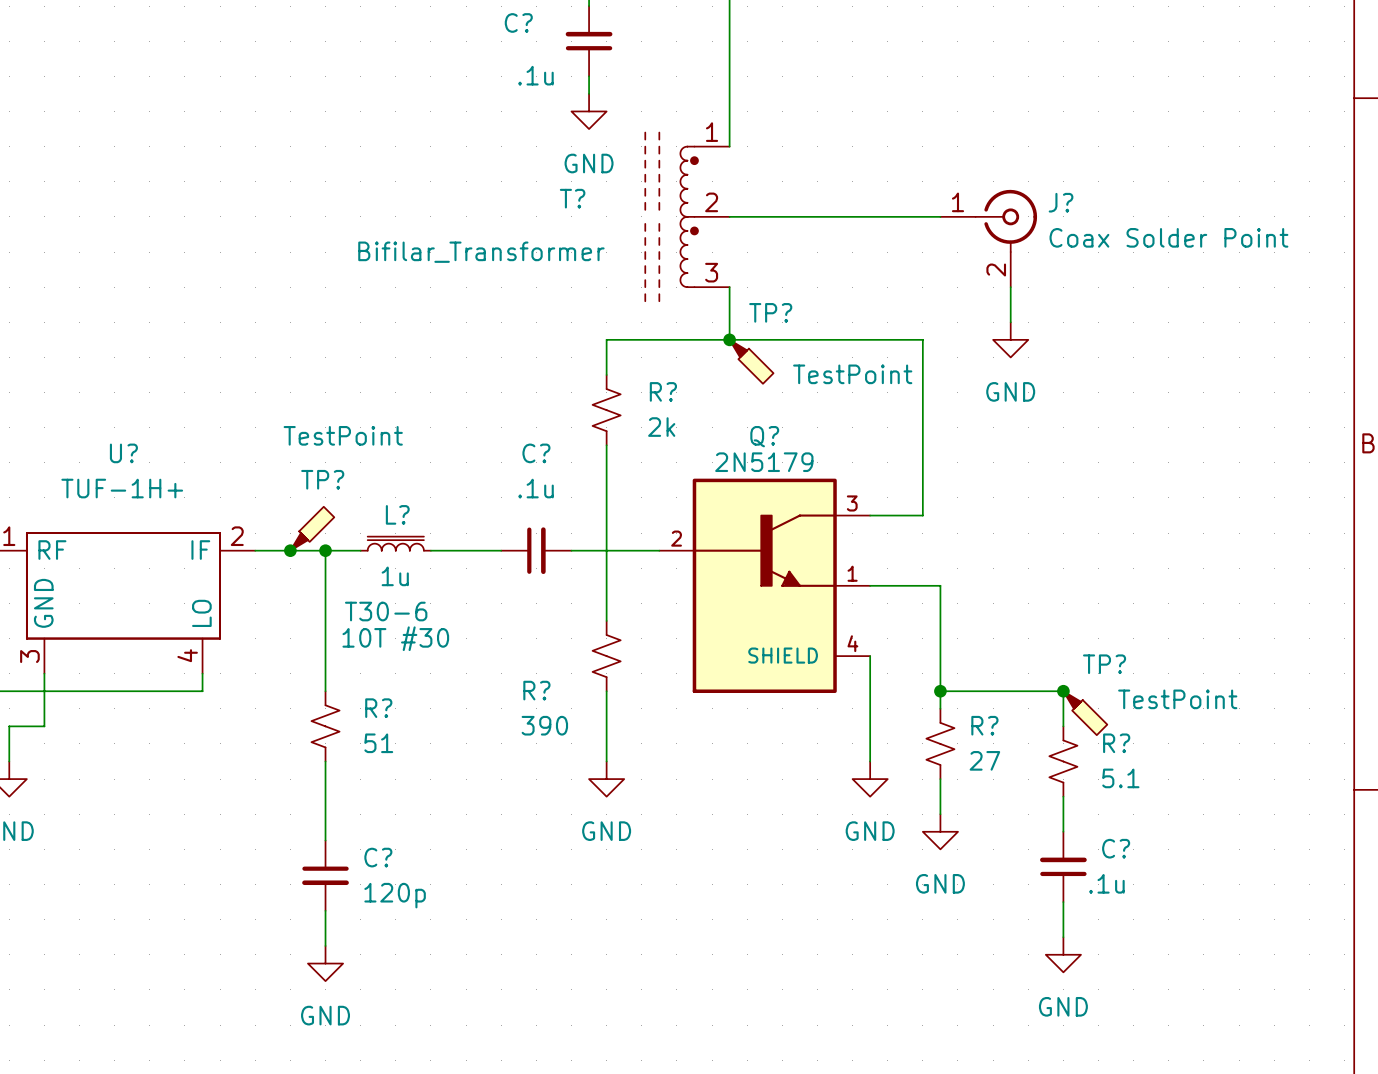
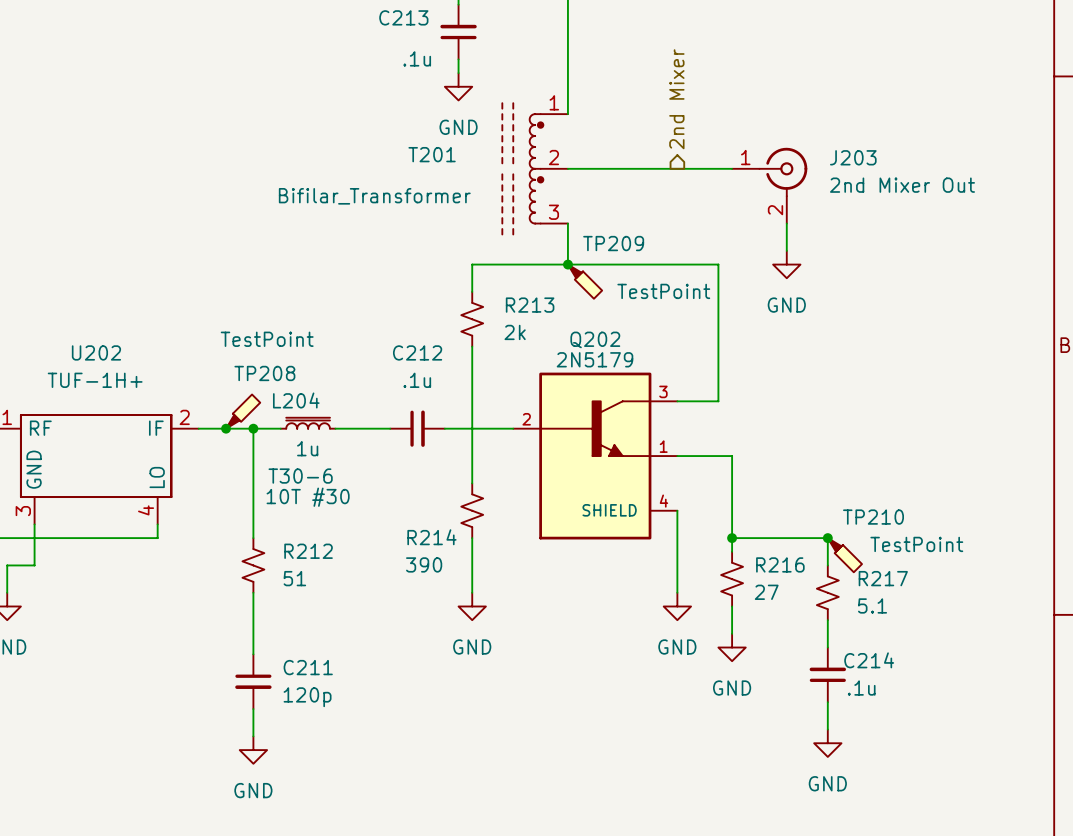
C? name: C? (518, 22) -> C213 (403, 17)
hierarchical label: none -> 2nd Mixer (676, 99)
T? name: T? (572, 198) -> T201 (432, 154)
J? name: J? (1061, 202) -> J203 (853, 157)
J? value: Coax Solder Point (1168, 237) -> 2nd Mixer Out (902, 185)
TP? name: TP? (770, 312) -> TP209 (613, 243)
R? name: R? (663, 391) -> R213 (530, 305)
Q? name: Q? (764, 436) -> Q202 (595, 339)
U? name: U? (123, 453) -> U202 (96, 352)
C? name: C? (536, 453) -> C212 (417, 352)
TP? name: TP? (322, 479) -> TP208 (264, 373)
L? name: L? (397, 514) -> L204 (296, 400)
TP? name: TP? (1104, 664) -> TP210 (873, 517)
R? name: R? (536, 690) -> R214 (431, 537)
R? name: R? (378, 708) -> R212 (308, 551)
R? name: R? (984, 725) -> R216 (780, 564)
R? name: R? (1116, 743) -> R217 (883, 578)
C? name: C? (1116, 848) -> C214 (869, 660)
C? name: C? (378, 857) -> C211 (308, 667)

